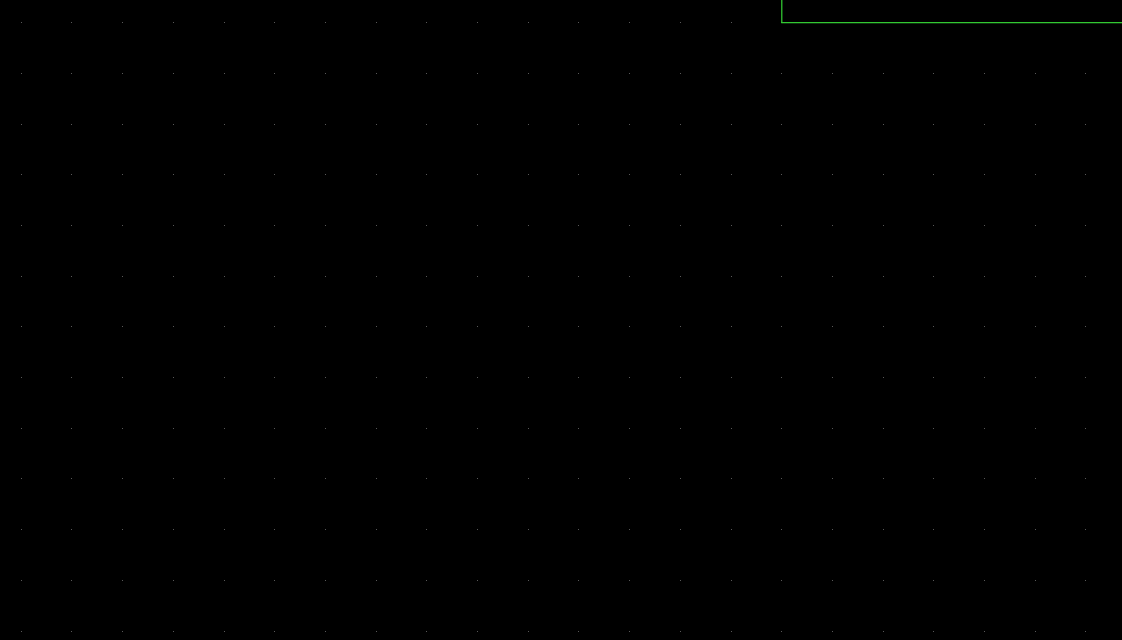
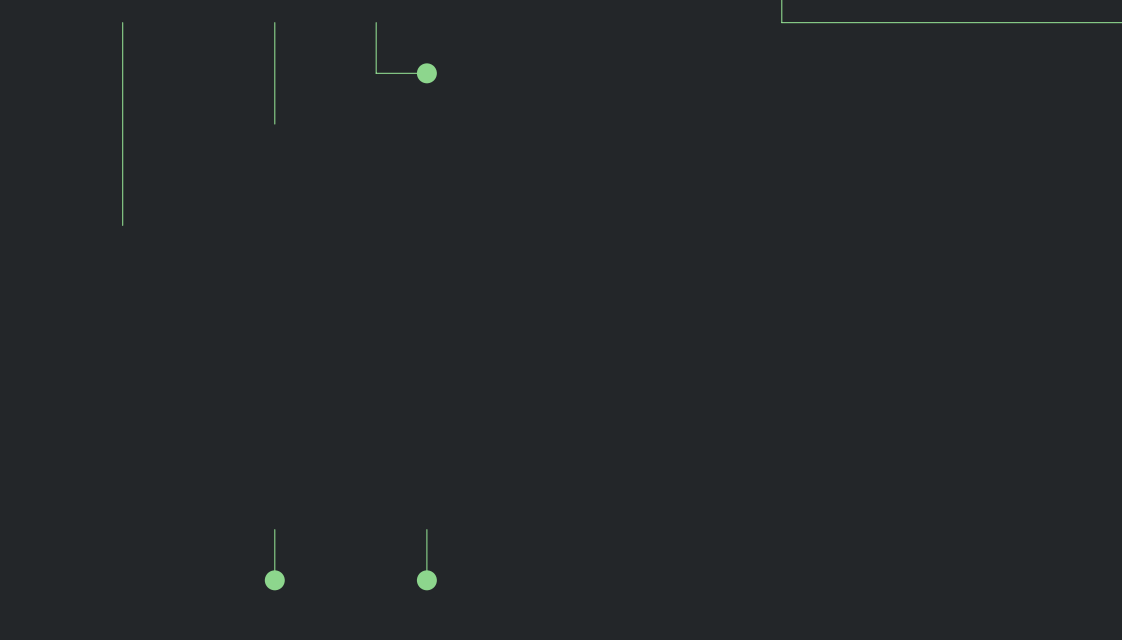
wire: none -> (122, 22) (122, 225)
wire: none -> (274, 22) (274, 124)
wire: none -> (376, 22) (376, 73) (426, 73)
junction: none -> (426, 73)
wire: none -> (274, 529) (274, 580)
wire: none -> (426, 529) (426, 580)
junction: none -> (274, 580)
junction: none -> (426, 580)

